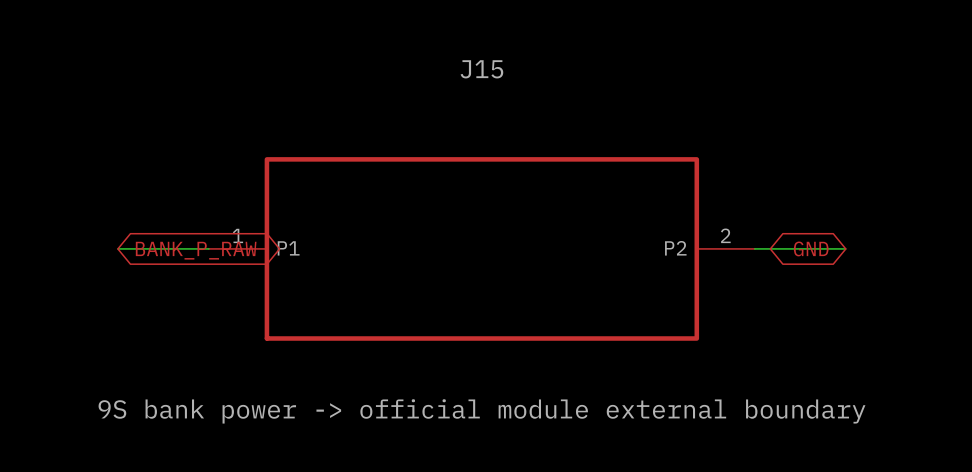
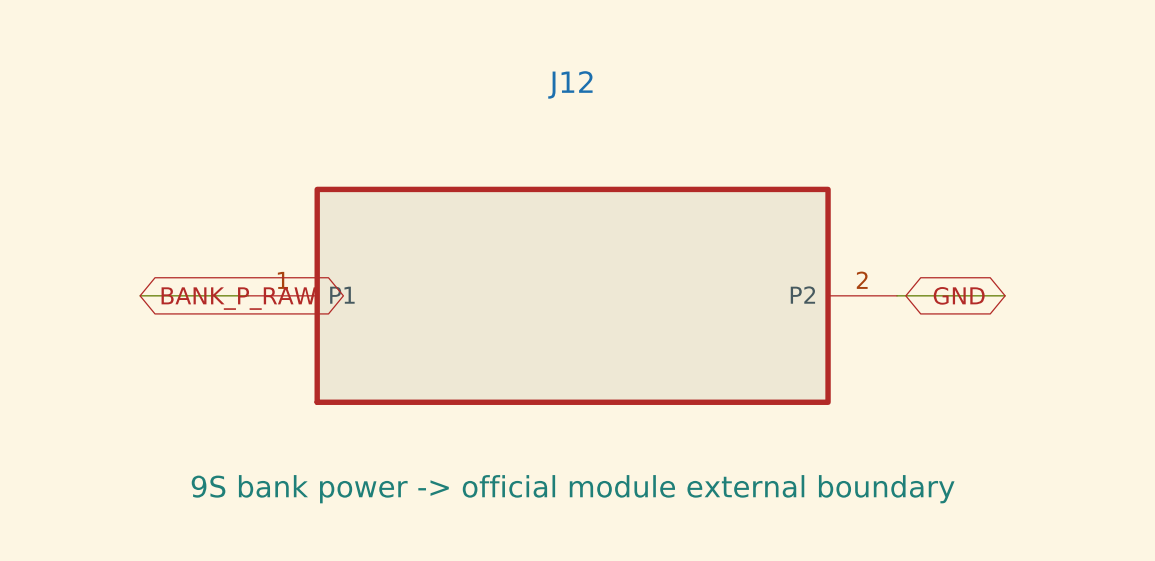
J15 name: J15 (481, 69) -> J12 (570, 84)

